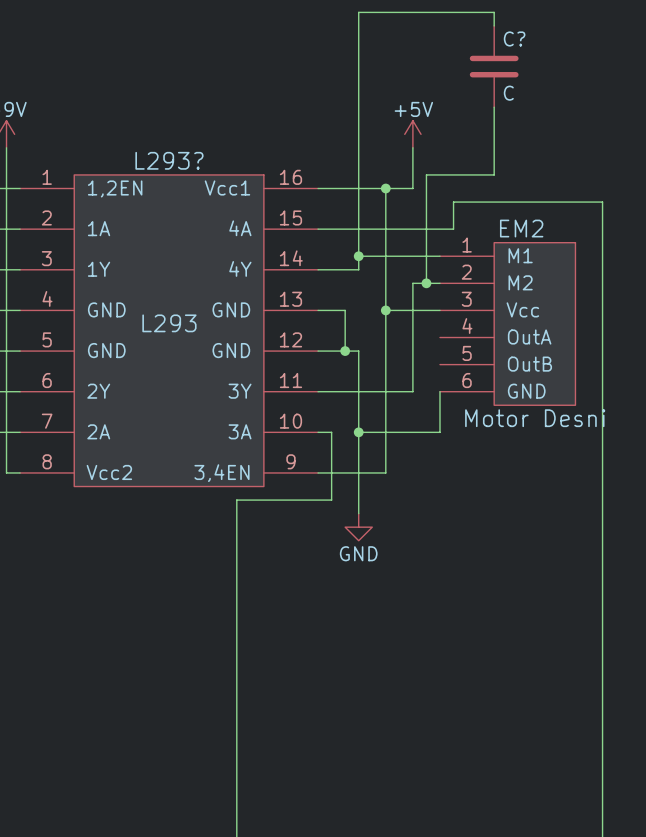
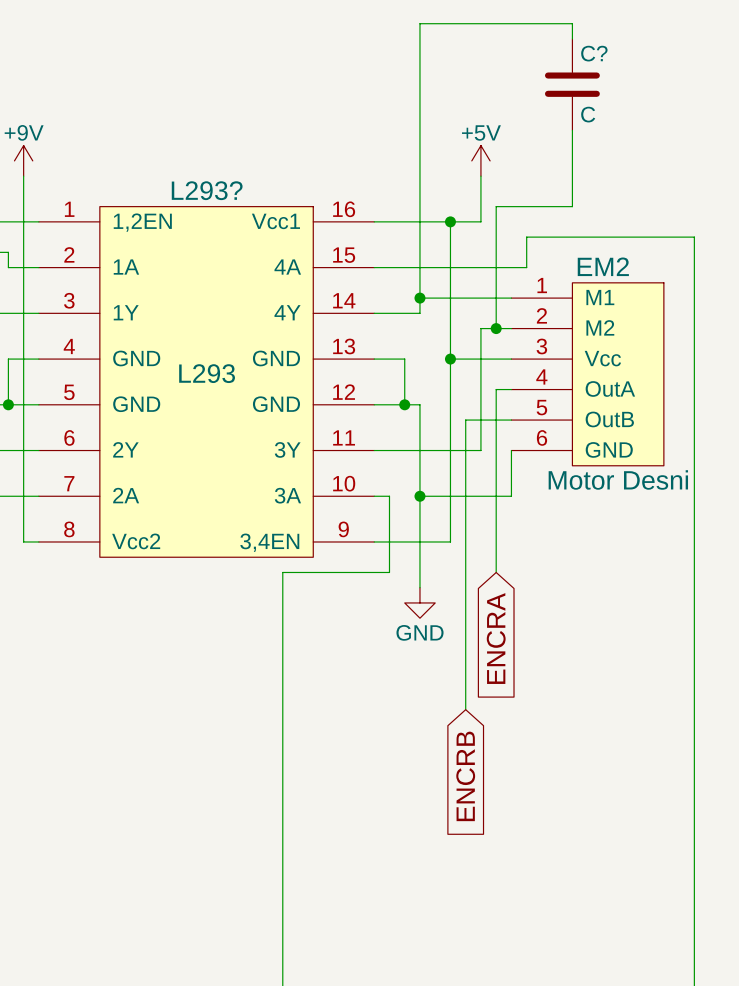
wire: none -> (511, 389) (496, 389) (496, 572)
wire: none -> (511, 420) (465, 420) (465, 709)
global label: none -> ENCRA (496, 638)
global label: none -> ENCRB (465, 776)

